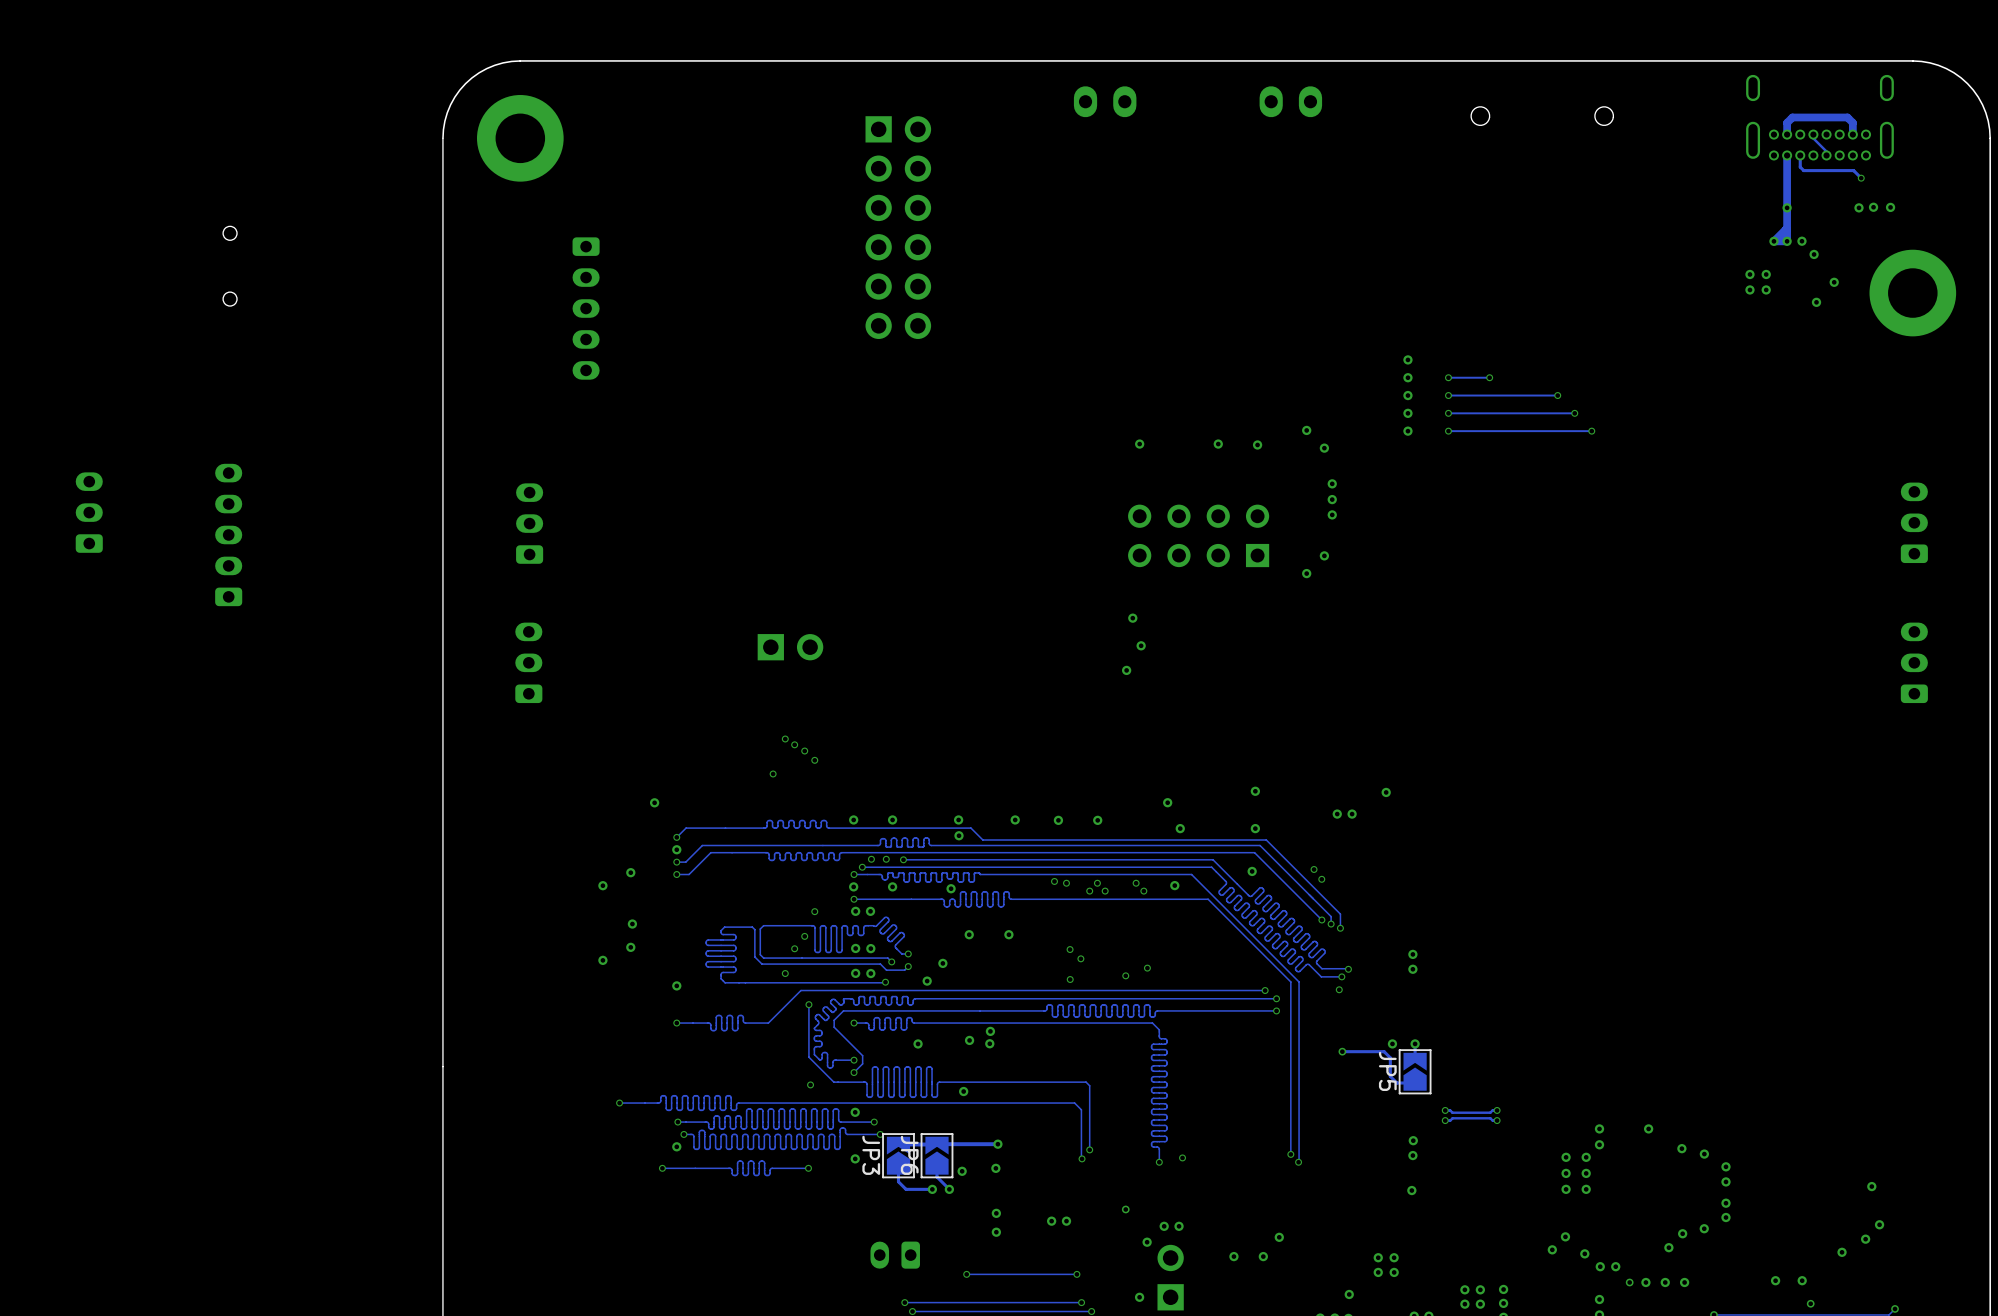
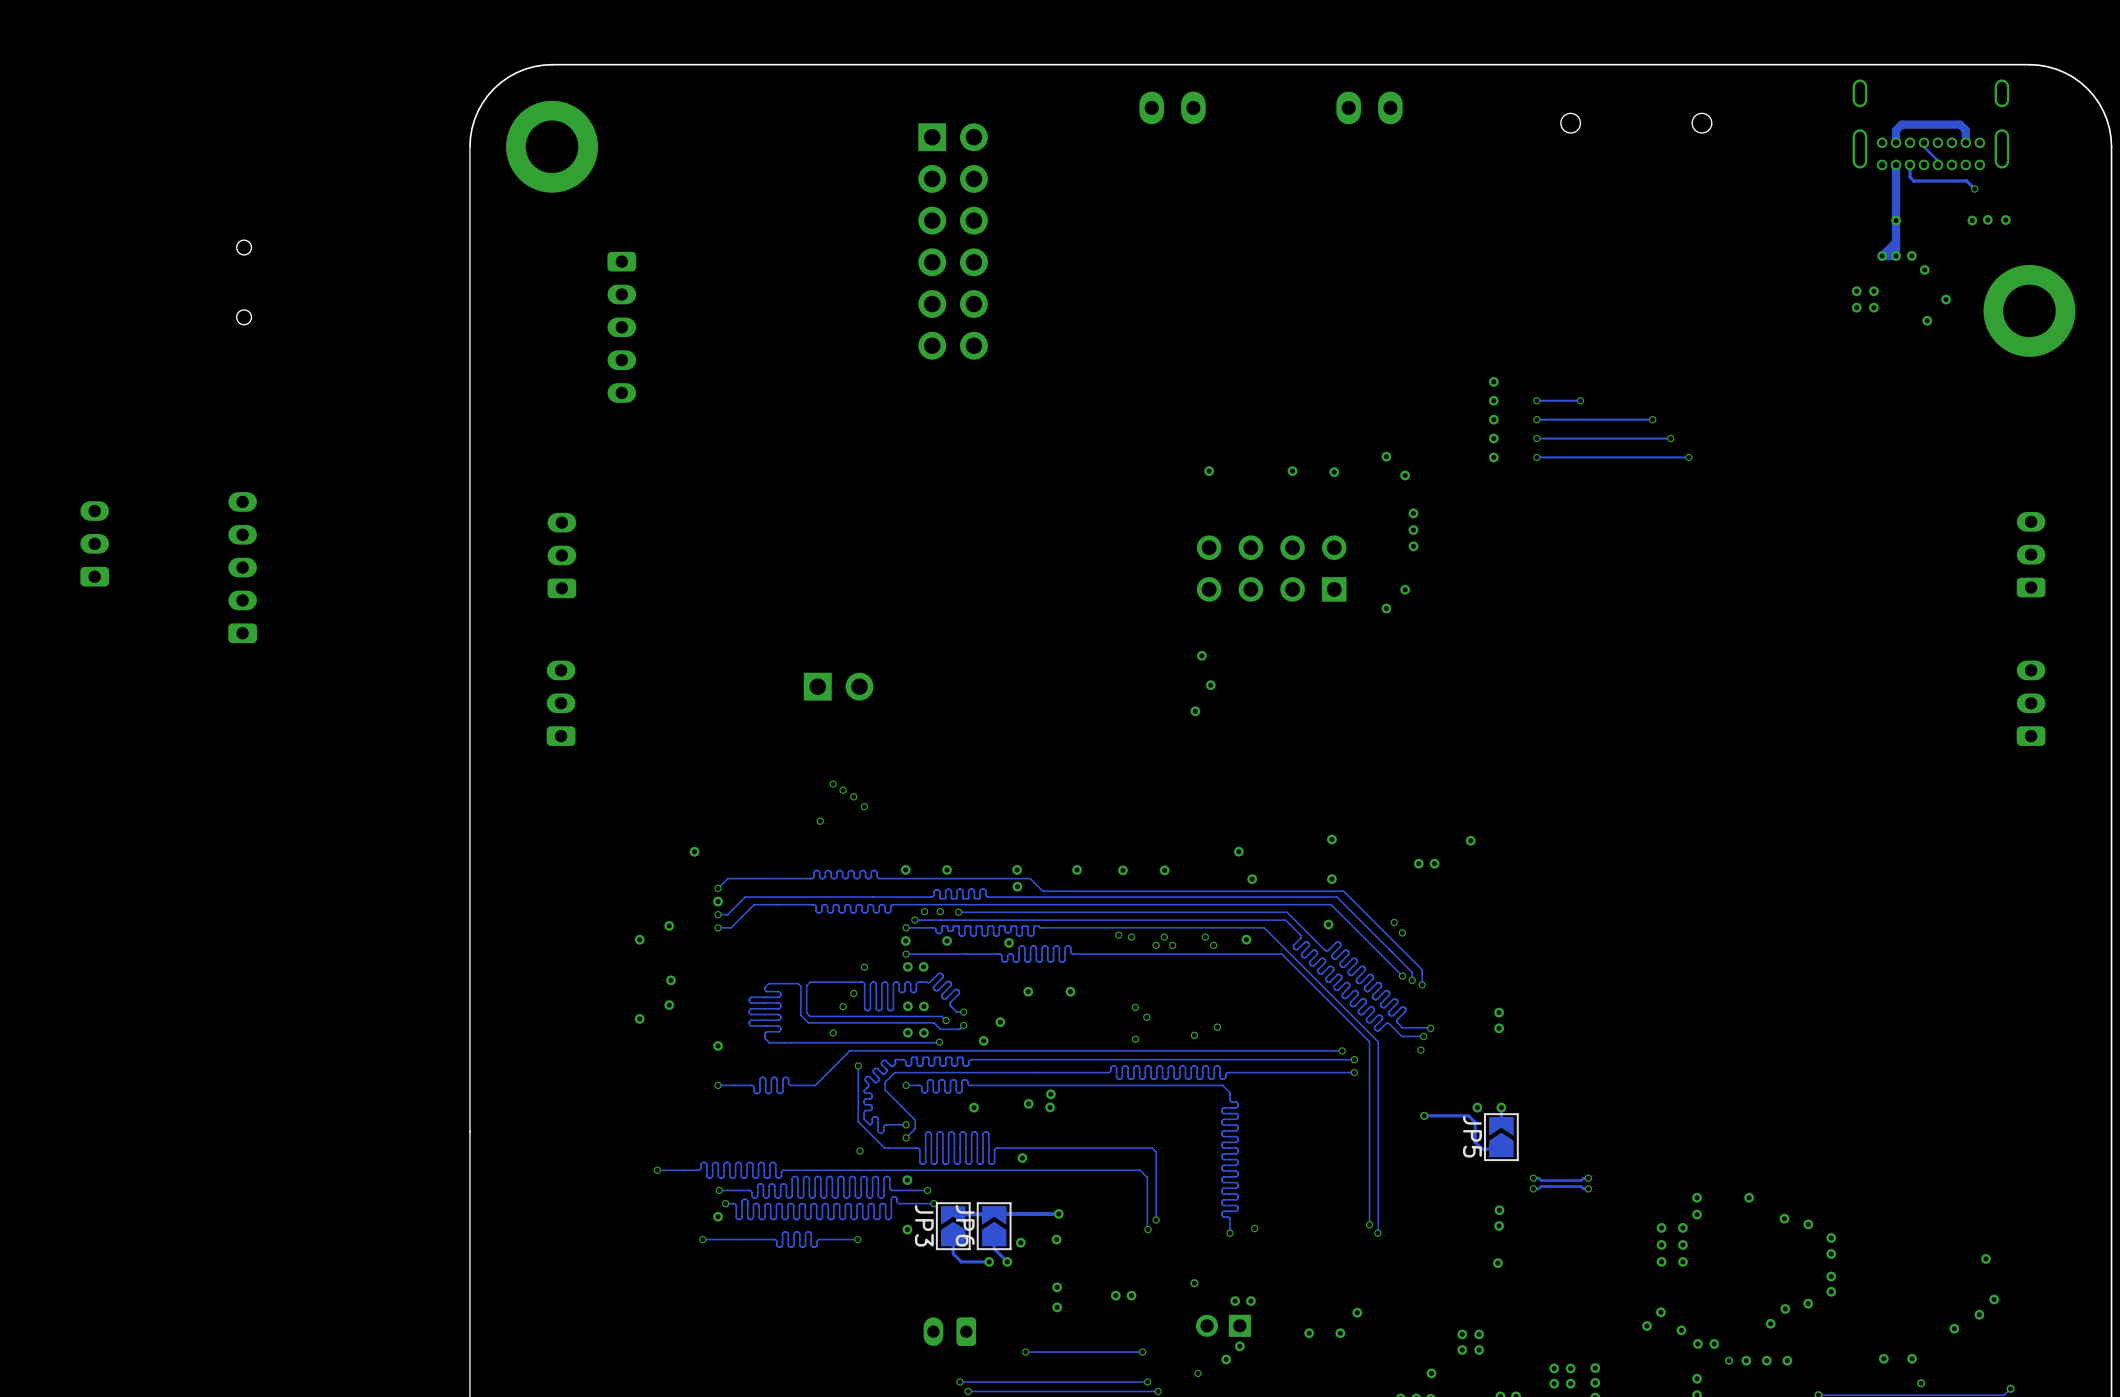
via: (1147, 1242) -> none
part: none -> (1223, 1325)
via: none -> (1239, 1346)
part: (1170, 1277) -> none
via: none -> (1226, 1359)
via: none -> (1198, 1373)
via: (1139, 1297) -> none

